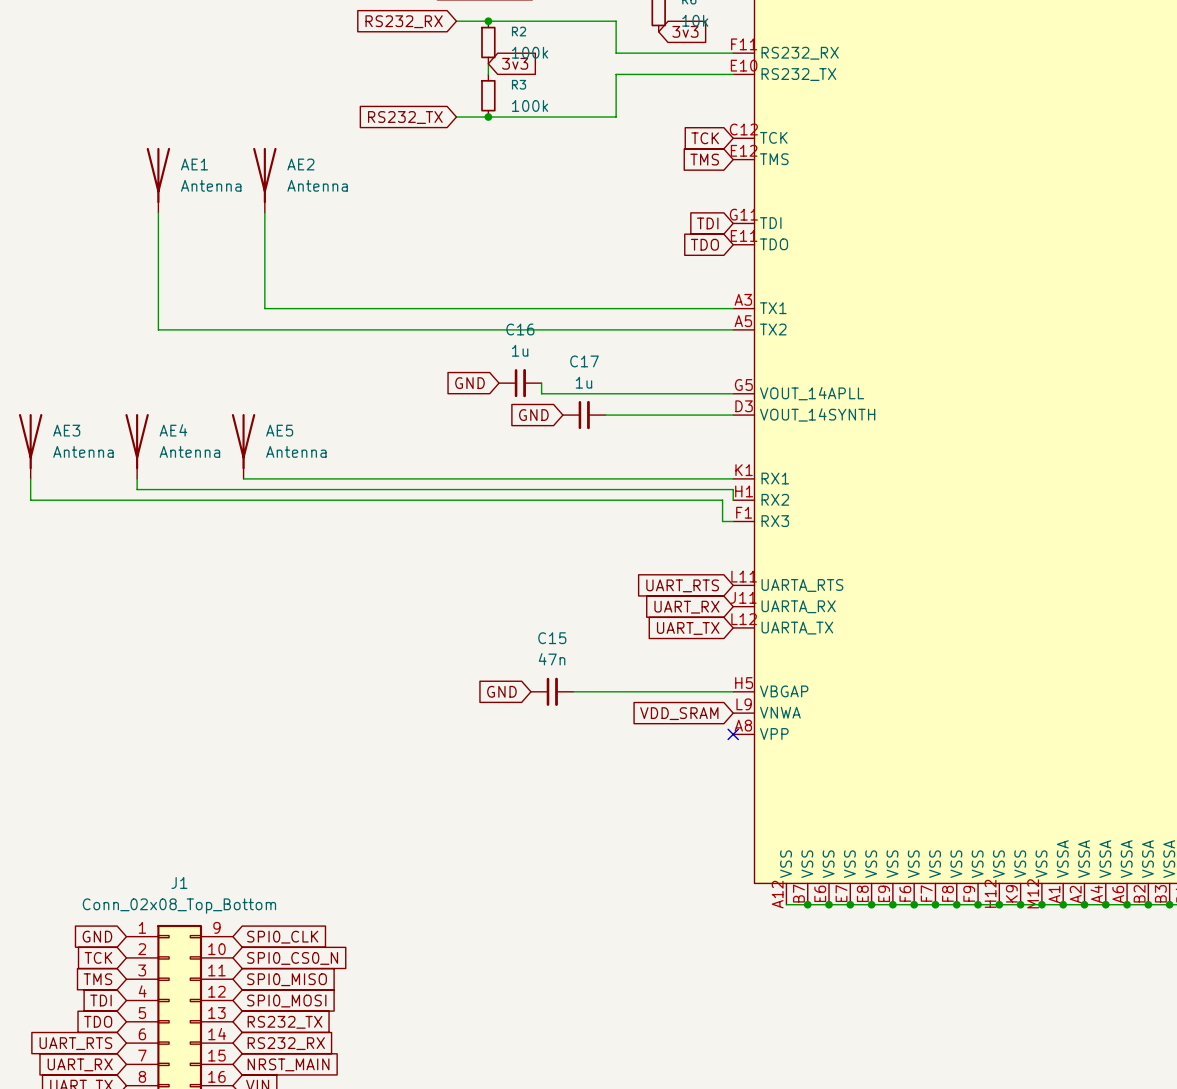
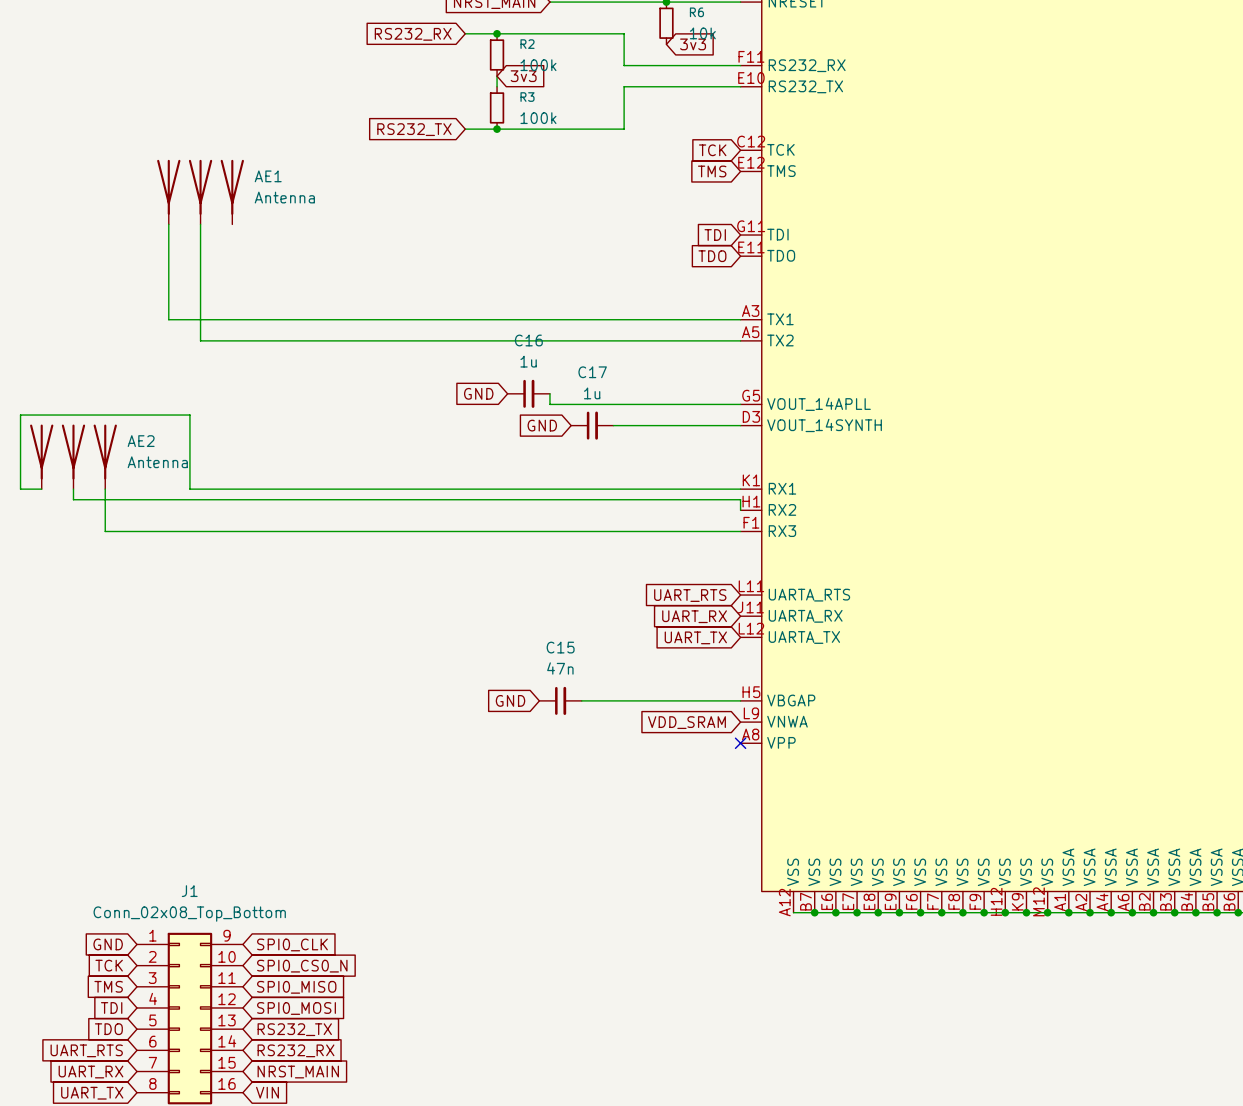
AE1 symbol: [146, 147, 171, 213] -> [157, 159, 244, 225]
AE2 symbol: [253, 147, 277, 213] -> [30, 424, 117, 490]
AE1 name position: AE1 (194, 164) -> AE1 (268, 176)
AE2 name position: AE2 (300, 164) -> AE2 (141, 441)
AE1 value position: Antenna (211, 185) -> Antenna (284, 197)
AE2 value position: Antenna (317, 185) -> Antenna (157, 462)
wire: none -> (200, 224) (200, 340)
wire: (264, 212) (264, 308) -> none
wire: (158, 308) (158, 329) (190, 329) -> (168, 319) (274, 319)
AE3: Antenna (30, 446) -> none
AE4: Antenna (137, 446) -> none
AE5: Antenna (243, 446) -> none
wire: (30, 478) (30, 500) (722, 500) (722, 521) -> (105, 489) (105, 531) (729, 531)
wire: none -> (41, 489) (20, 489) (20, 415) (189, 415) (189, 489) (253, 489)
wire: (137, 478) (137, 489) -> (73, 489) (73, 499) (147, 499)

